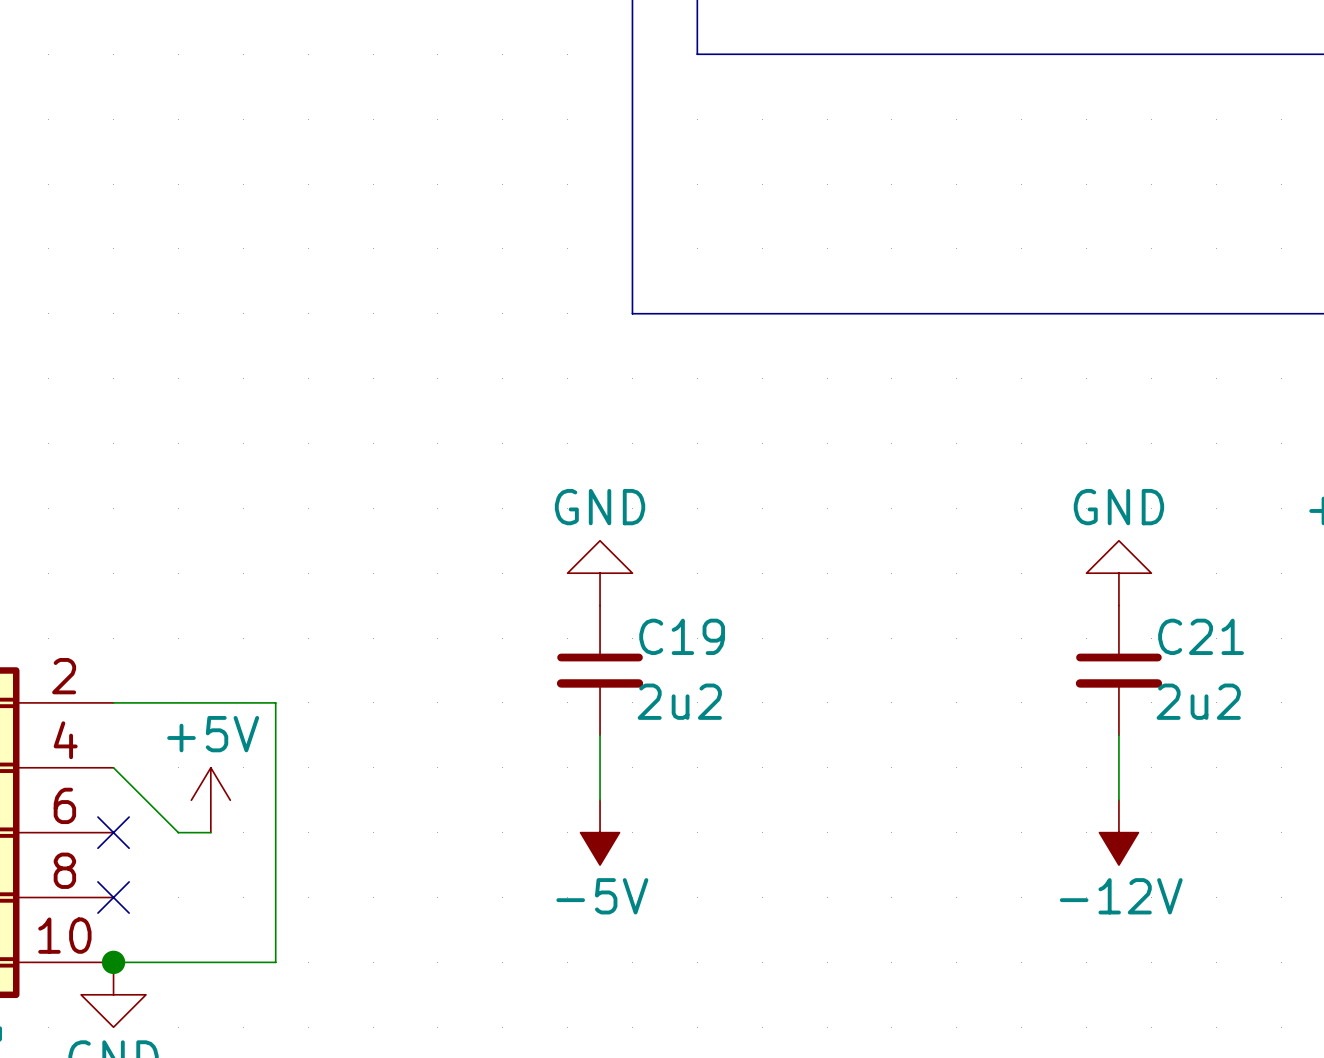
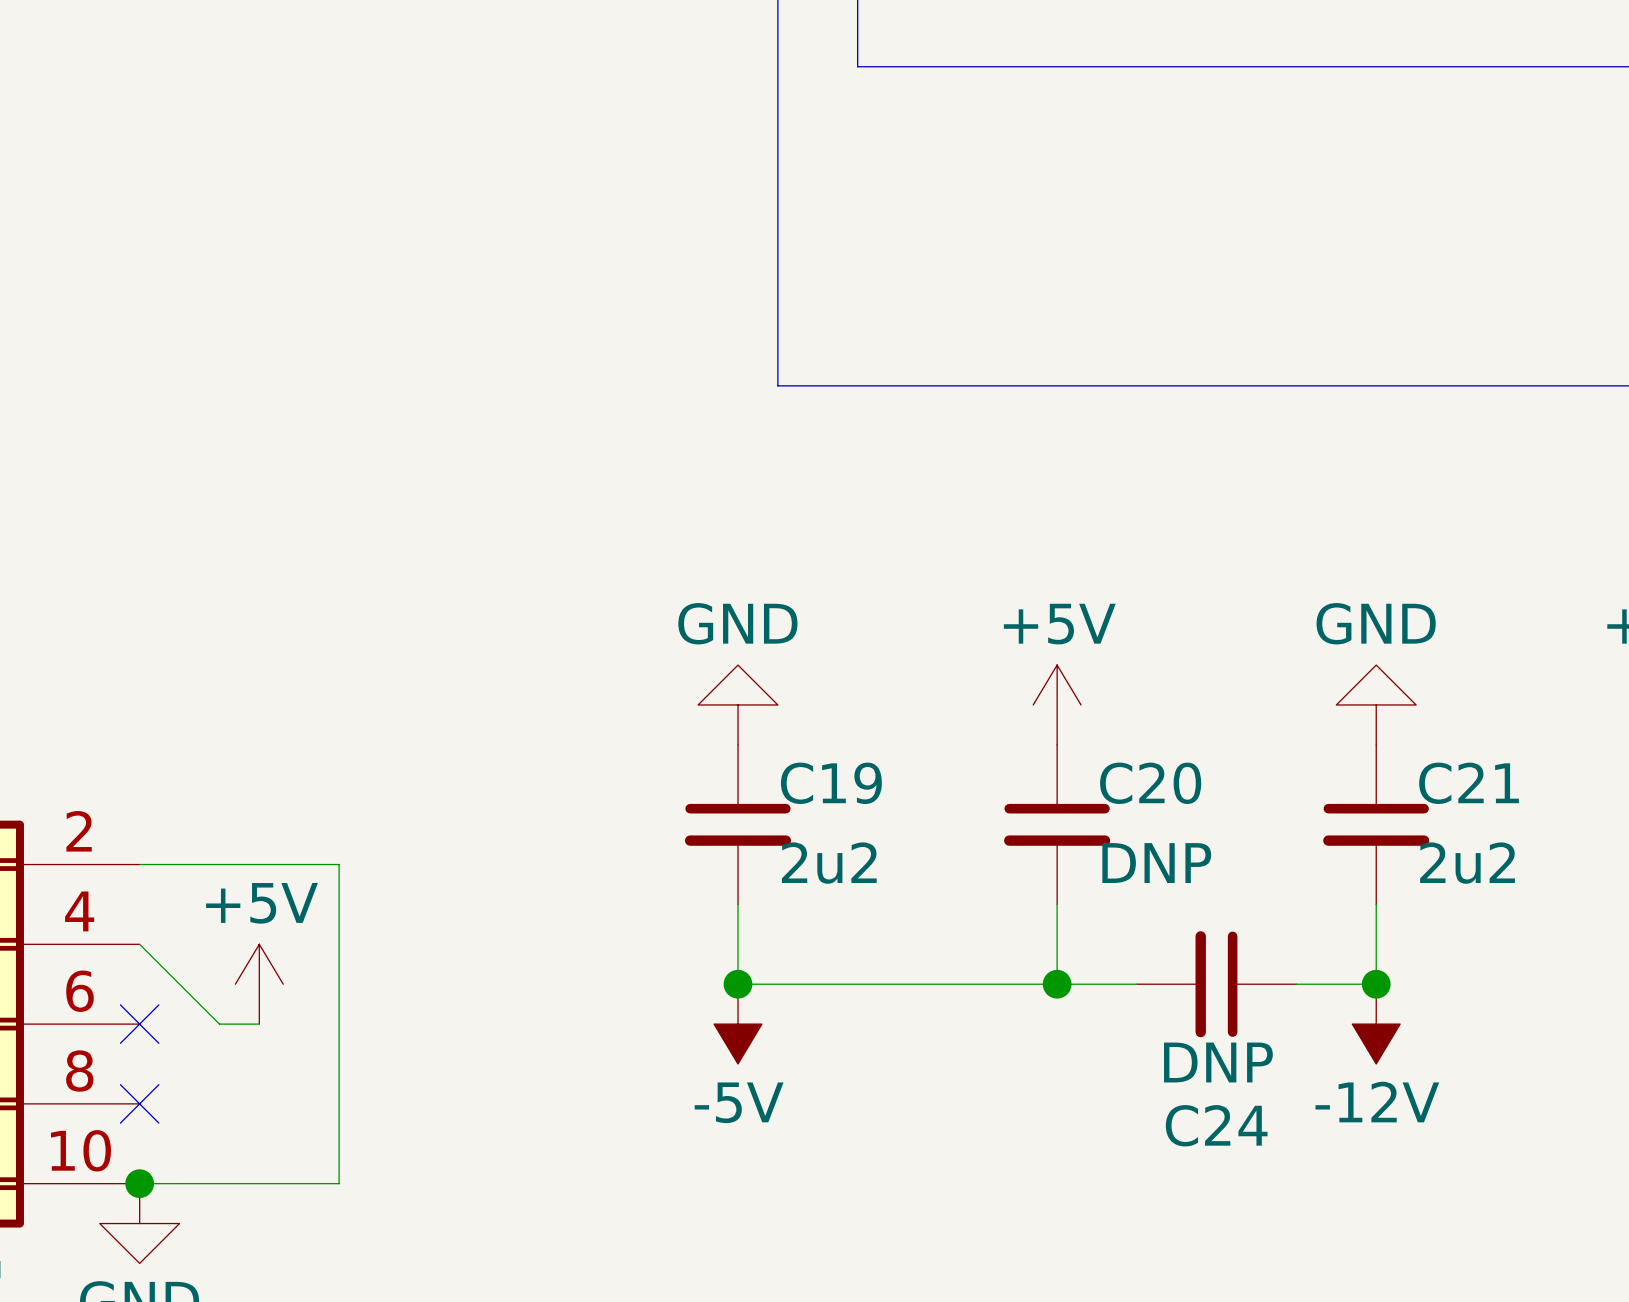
power symbol: none -> +5V (1057, 704)
C20: none -> DNP (1057, 824)
wire: none -> (1057, 904) (1057, 984)
wire: none -> (738, 984) (1136, 984)
junction: none -> (738, 984)
junction: none -> (1057, 984)
C24: none -> DNP (1216, 984)
wire: none -> (1296, 984) (1376, 984)
junction: none -> (1376, 984)

